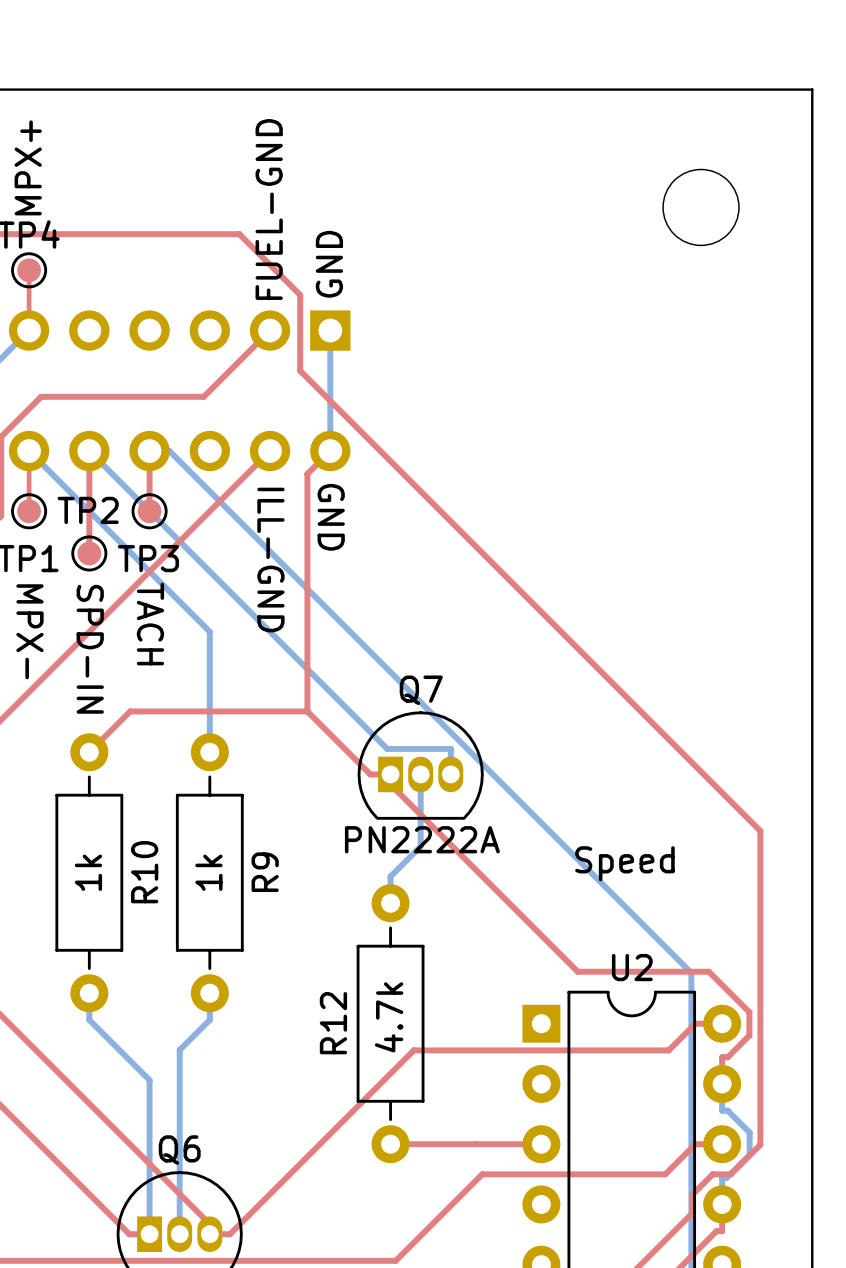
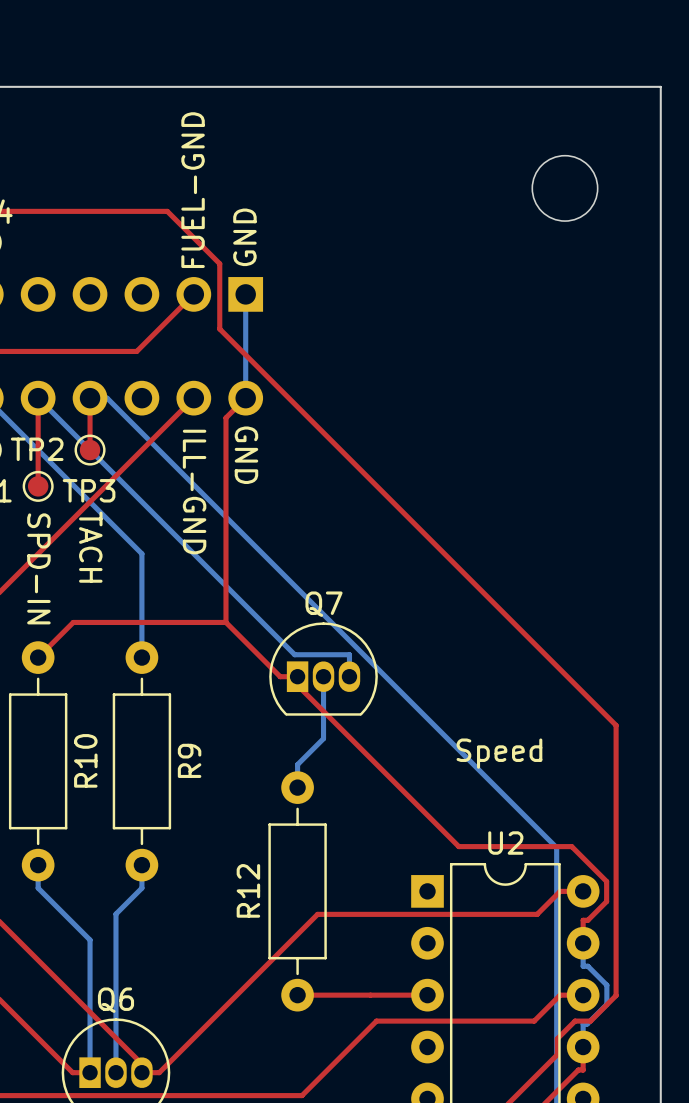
Q7 value: PN2222A (422, 839) -> none
R10 value: 1k (88, 872) -> none
R9 value: 1k (208, 872) -> none
R12 value: 4.7k (389, 1017) -> none

